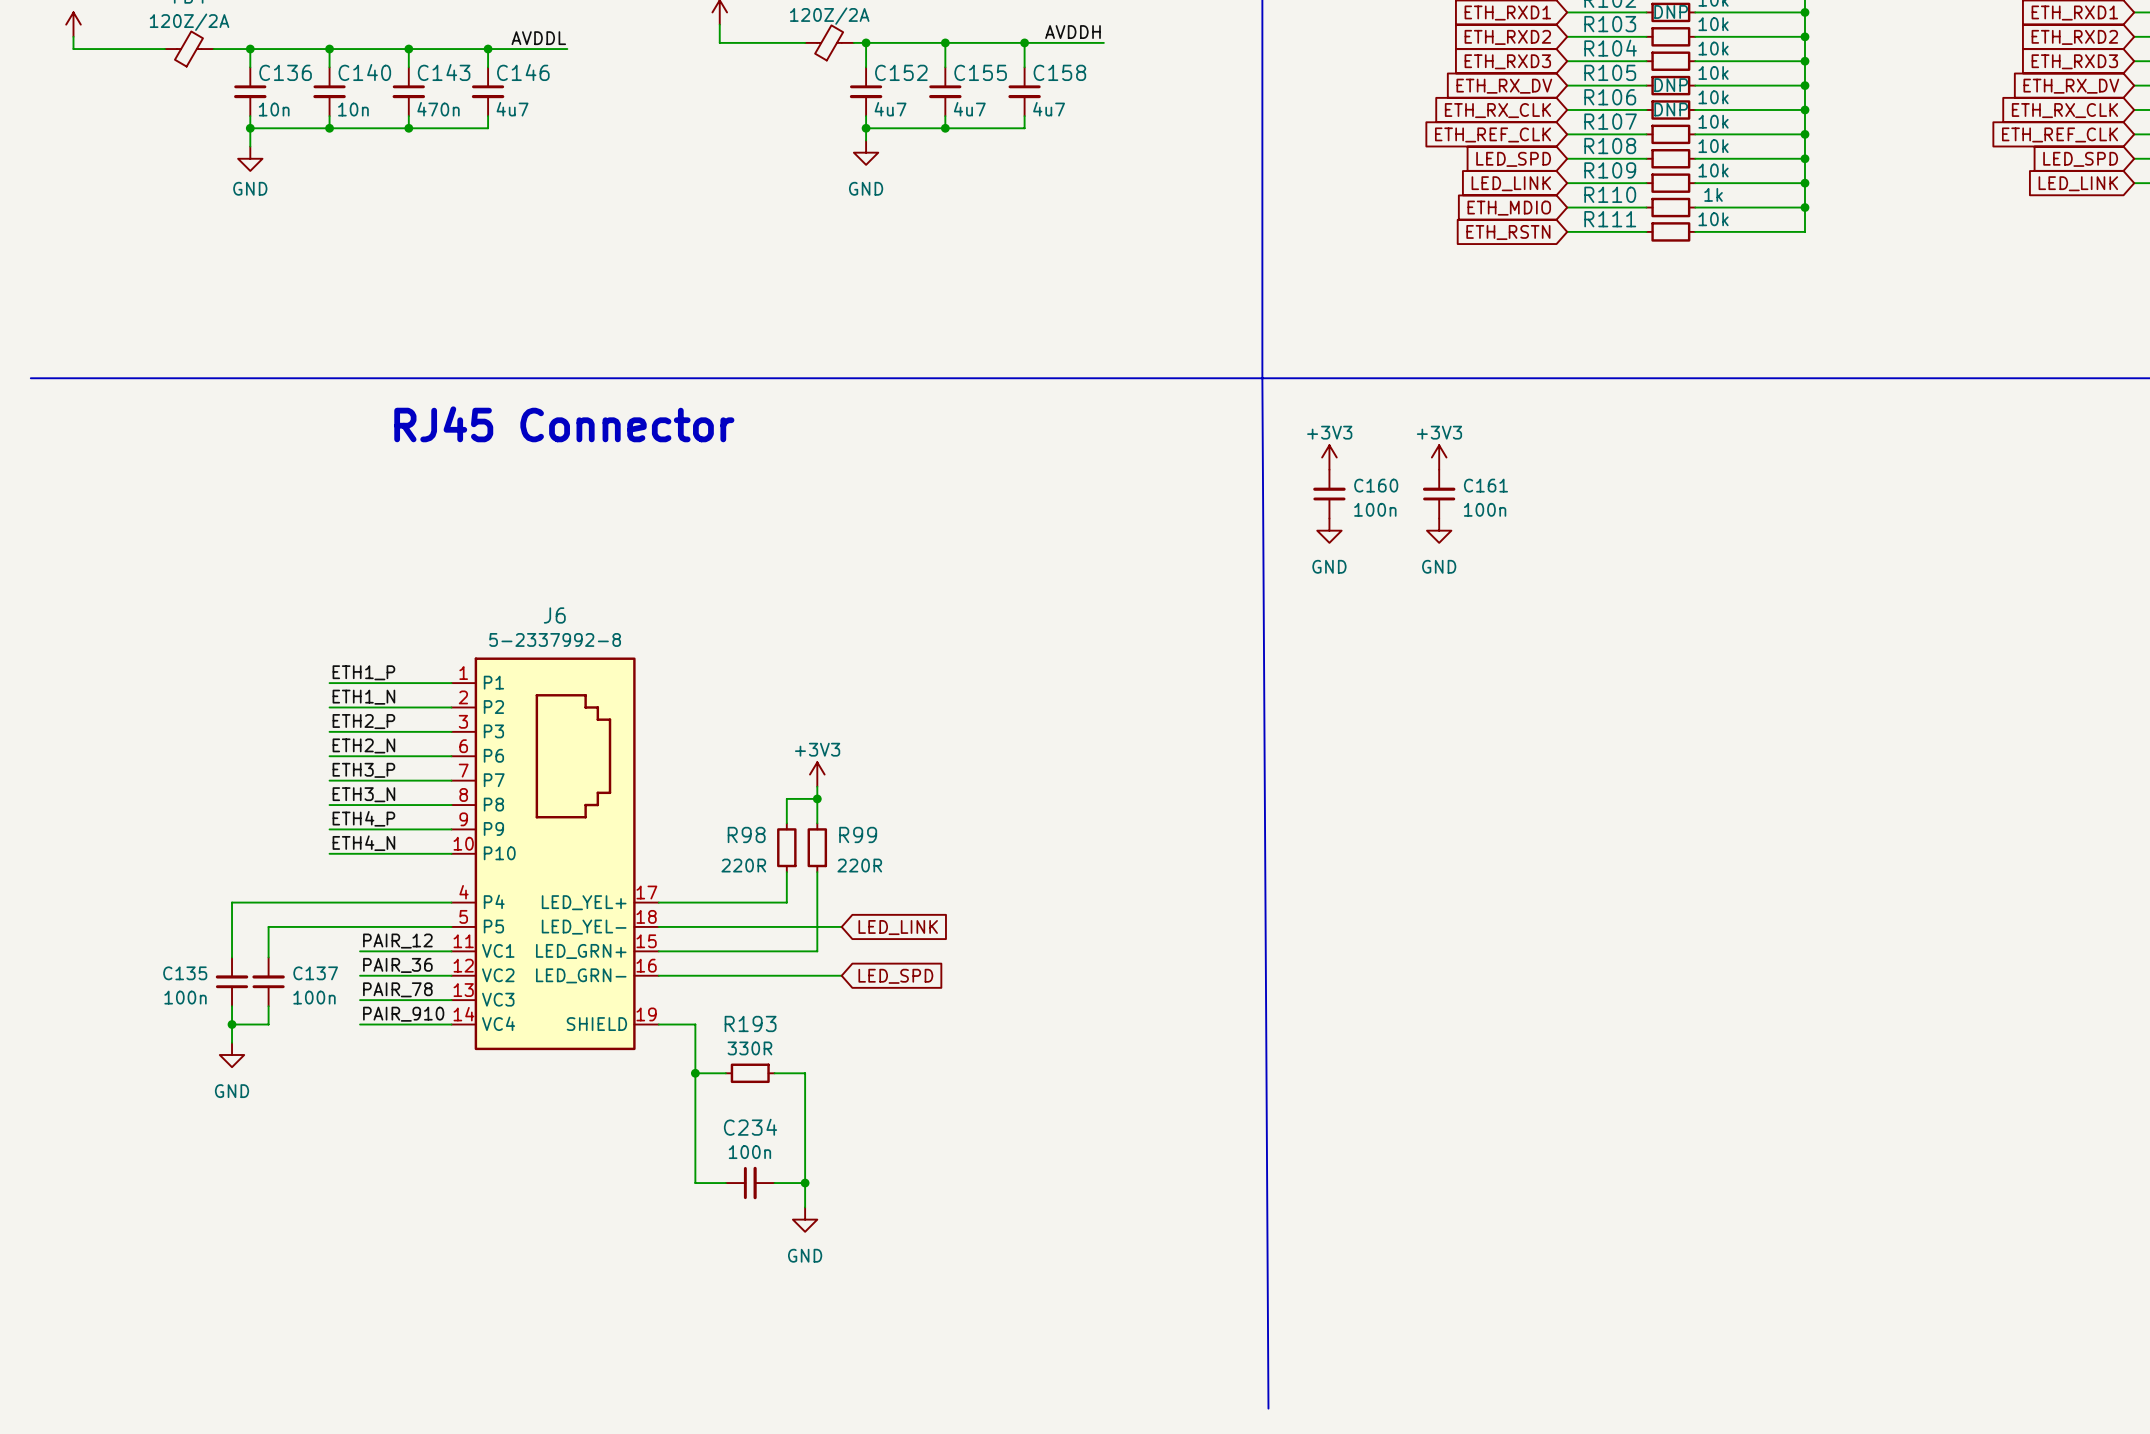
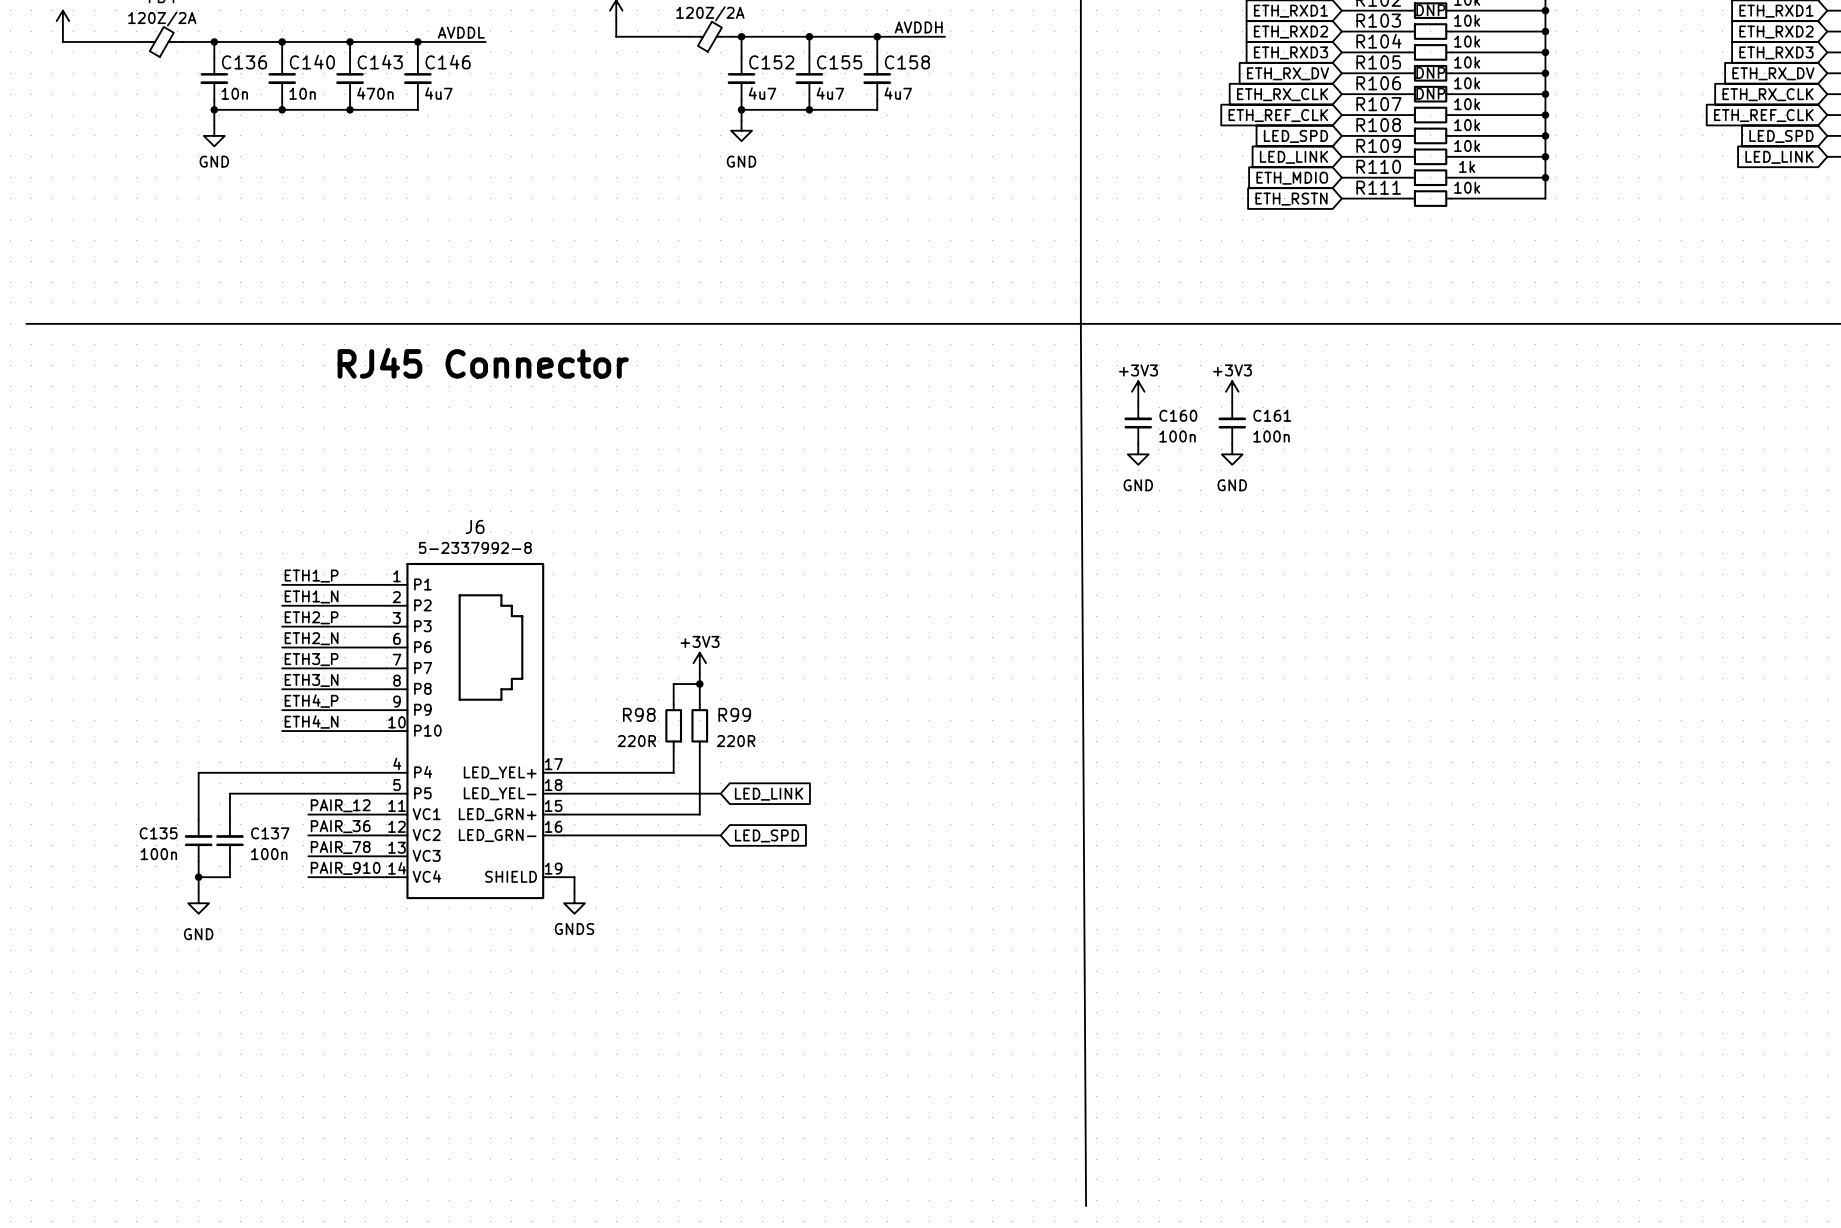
wire: (670, 1024) (695, 1024) (695, 1183) (725, 1183) -> (574, 877) (574, 892)
power symbol: none -> GNDS (574, 903)
wire: (695, 1073) (725, 1073) -> none
junction: (695, 1073) -> none
R193: (750, 1073) -> none
wire: (774, 1073) (805, 1073) (805, 1207) -> none
C234: (750, 1183) -> none
wire: (774, 1183) (805, 1183) -> none
junction: (805, 1183) -> none
power symbol: GND (805, 1219) -> none

